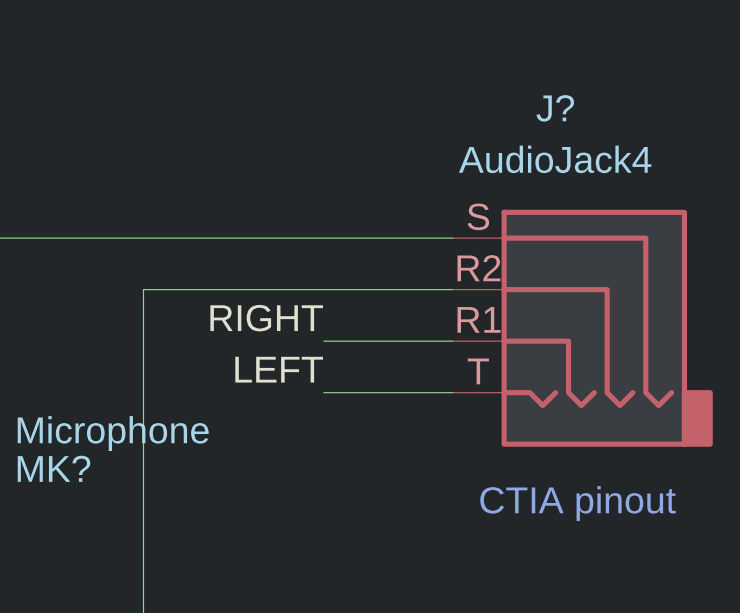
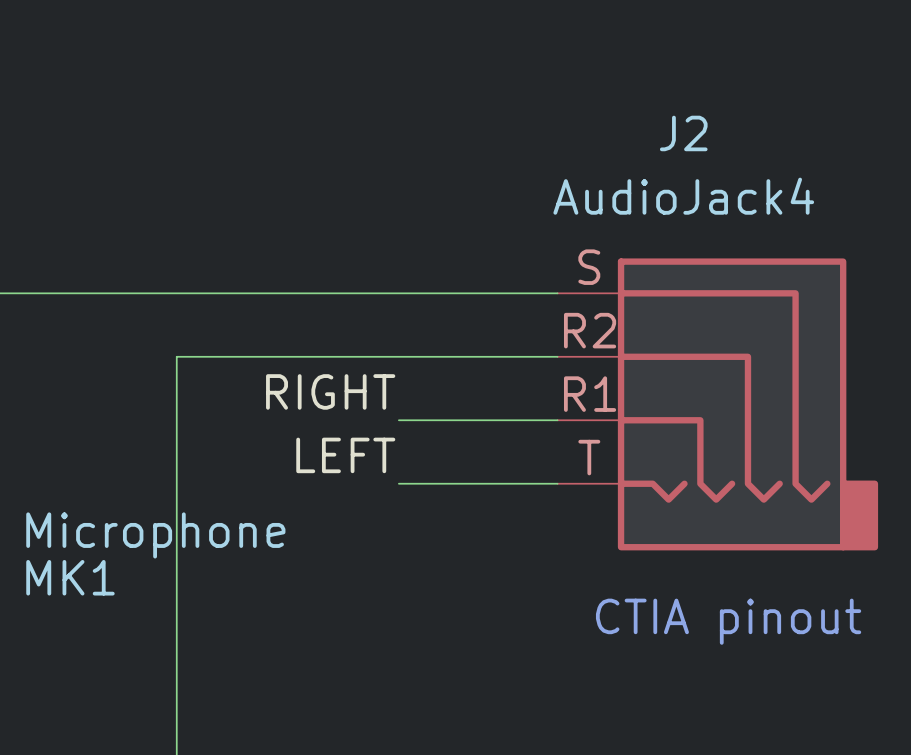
J? name: J? (555, 108) -> J2 (683, 133)
MK? name: MK? (54, 468) -> MK1 (70, 577)

